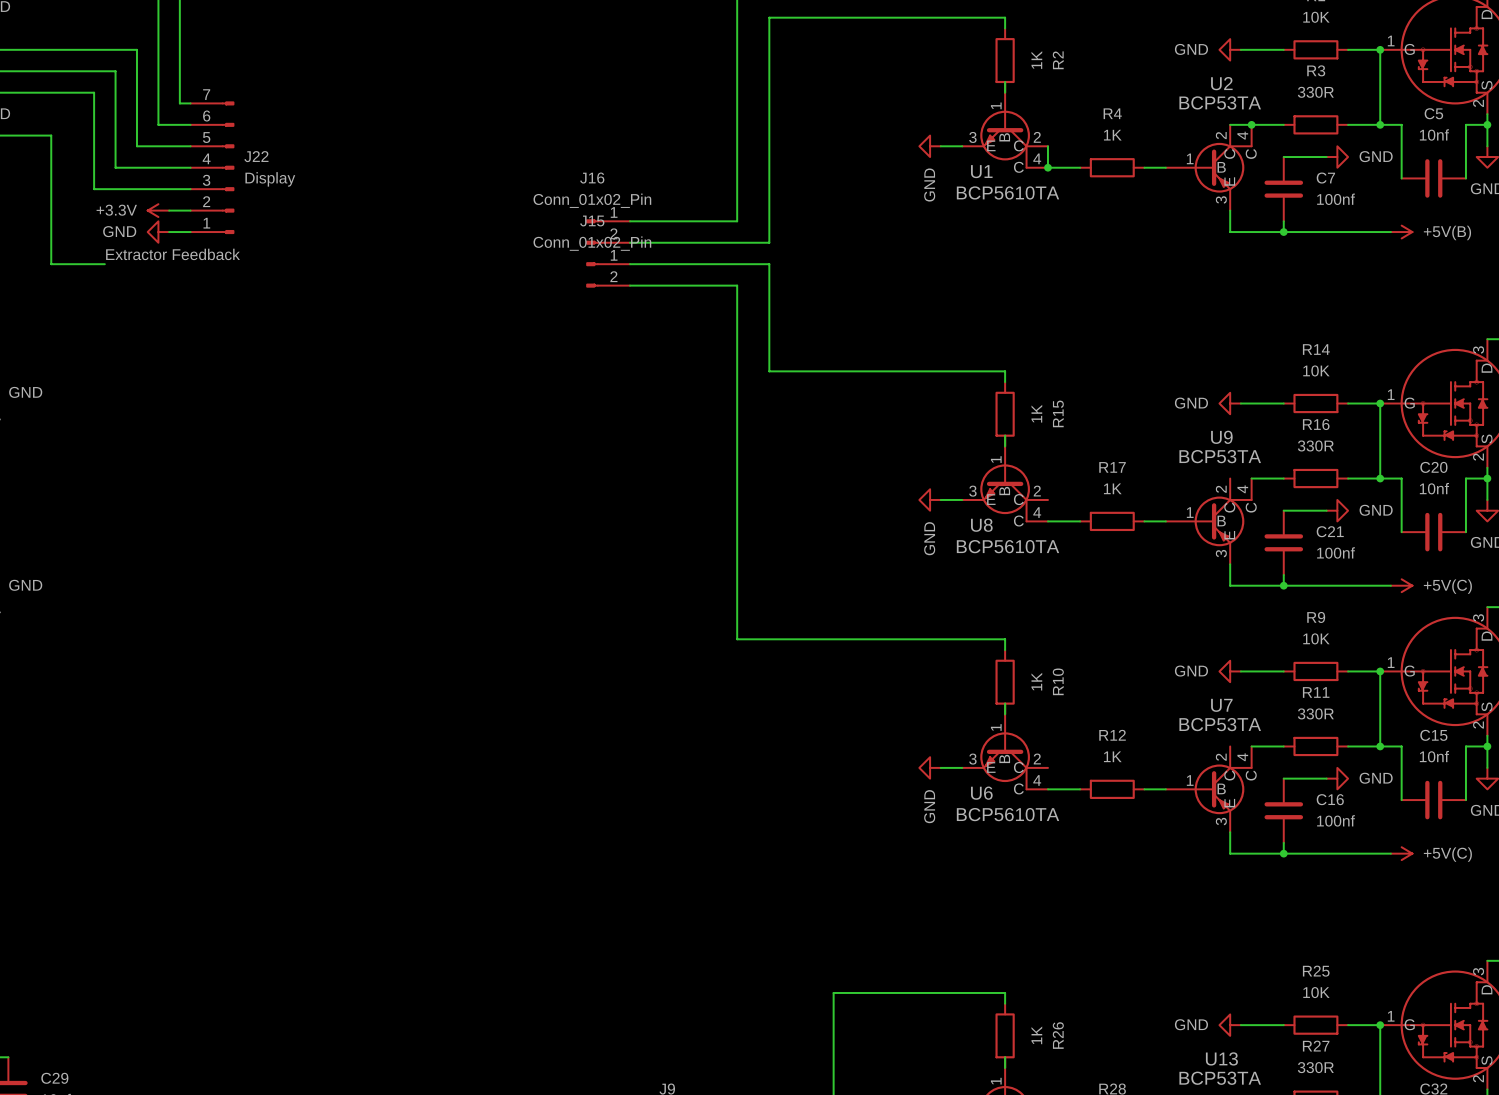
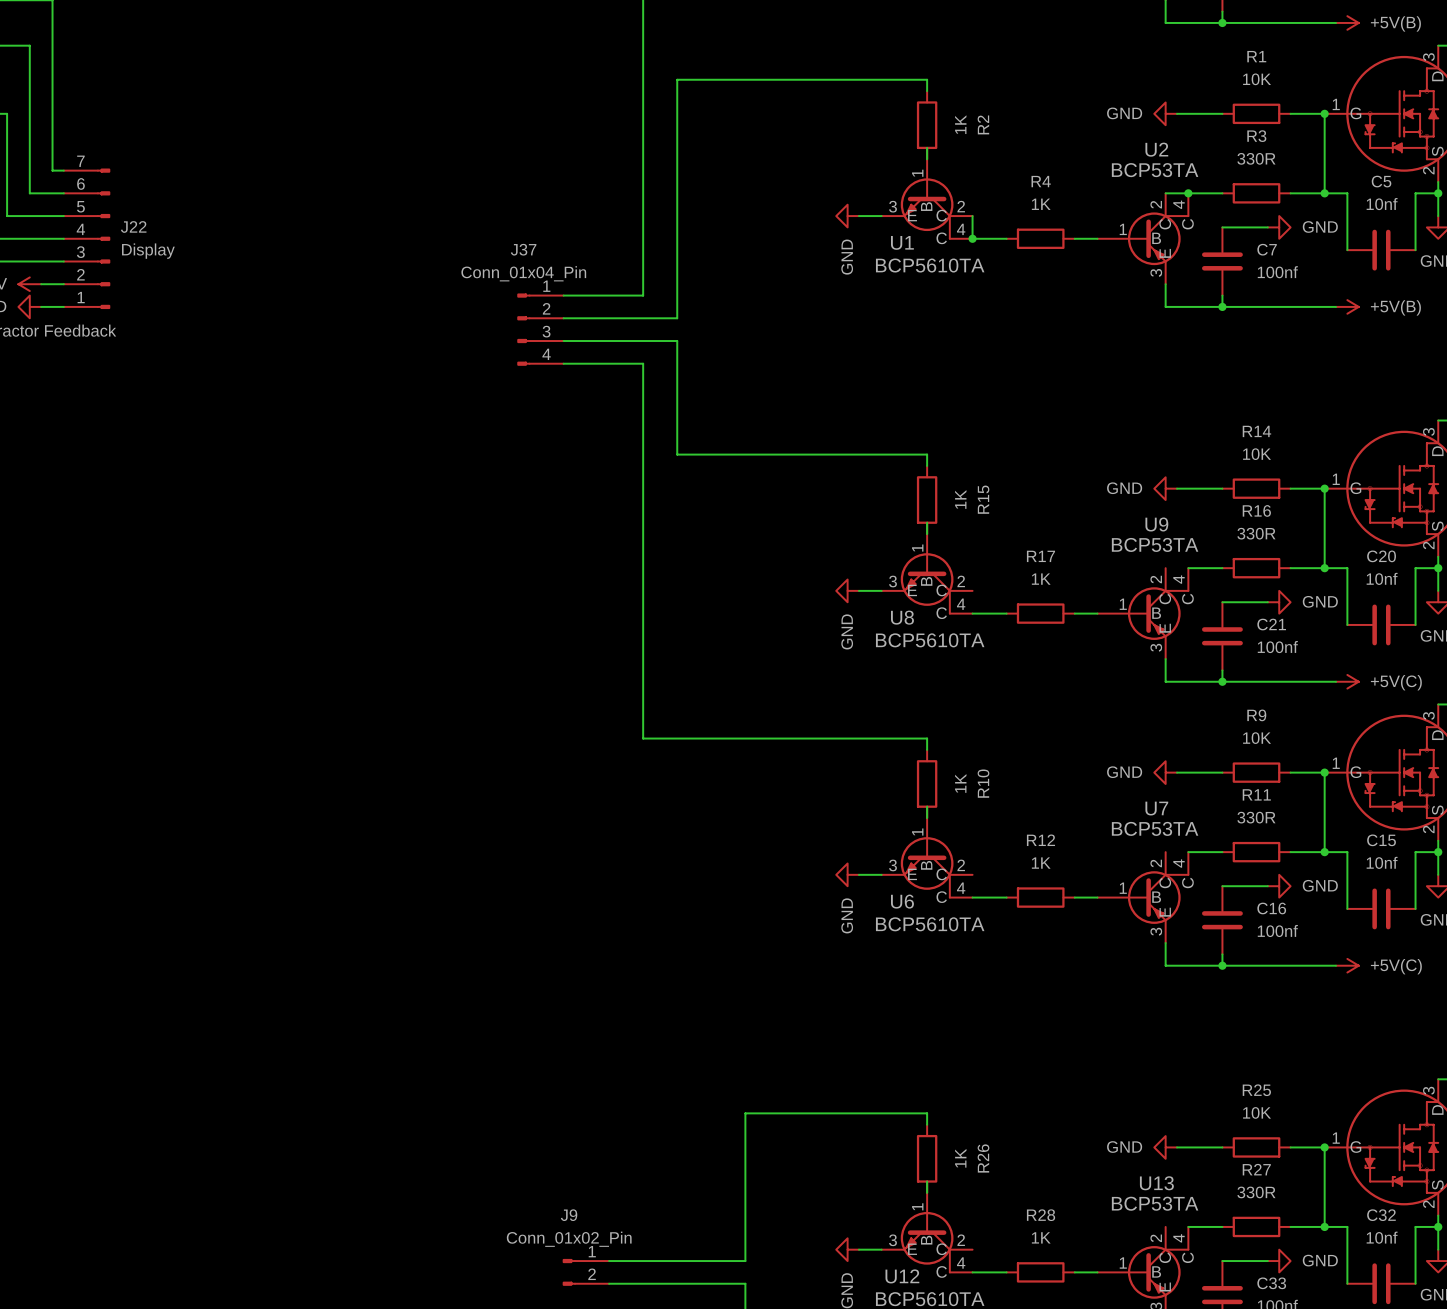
J16: Conn_01x02_Pin (608, 232) -> none
J37: none -> Conn_01x04_Pin (540, 329)
J15: Conn_01x02_Pin (608, 274) -> none

